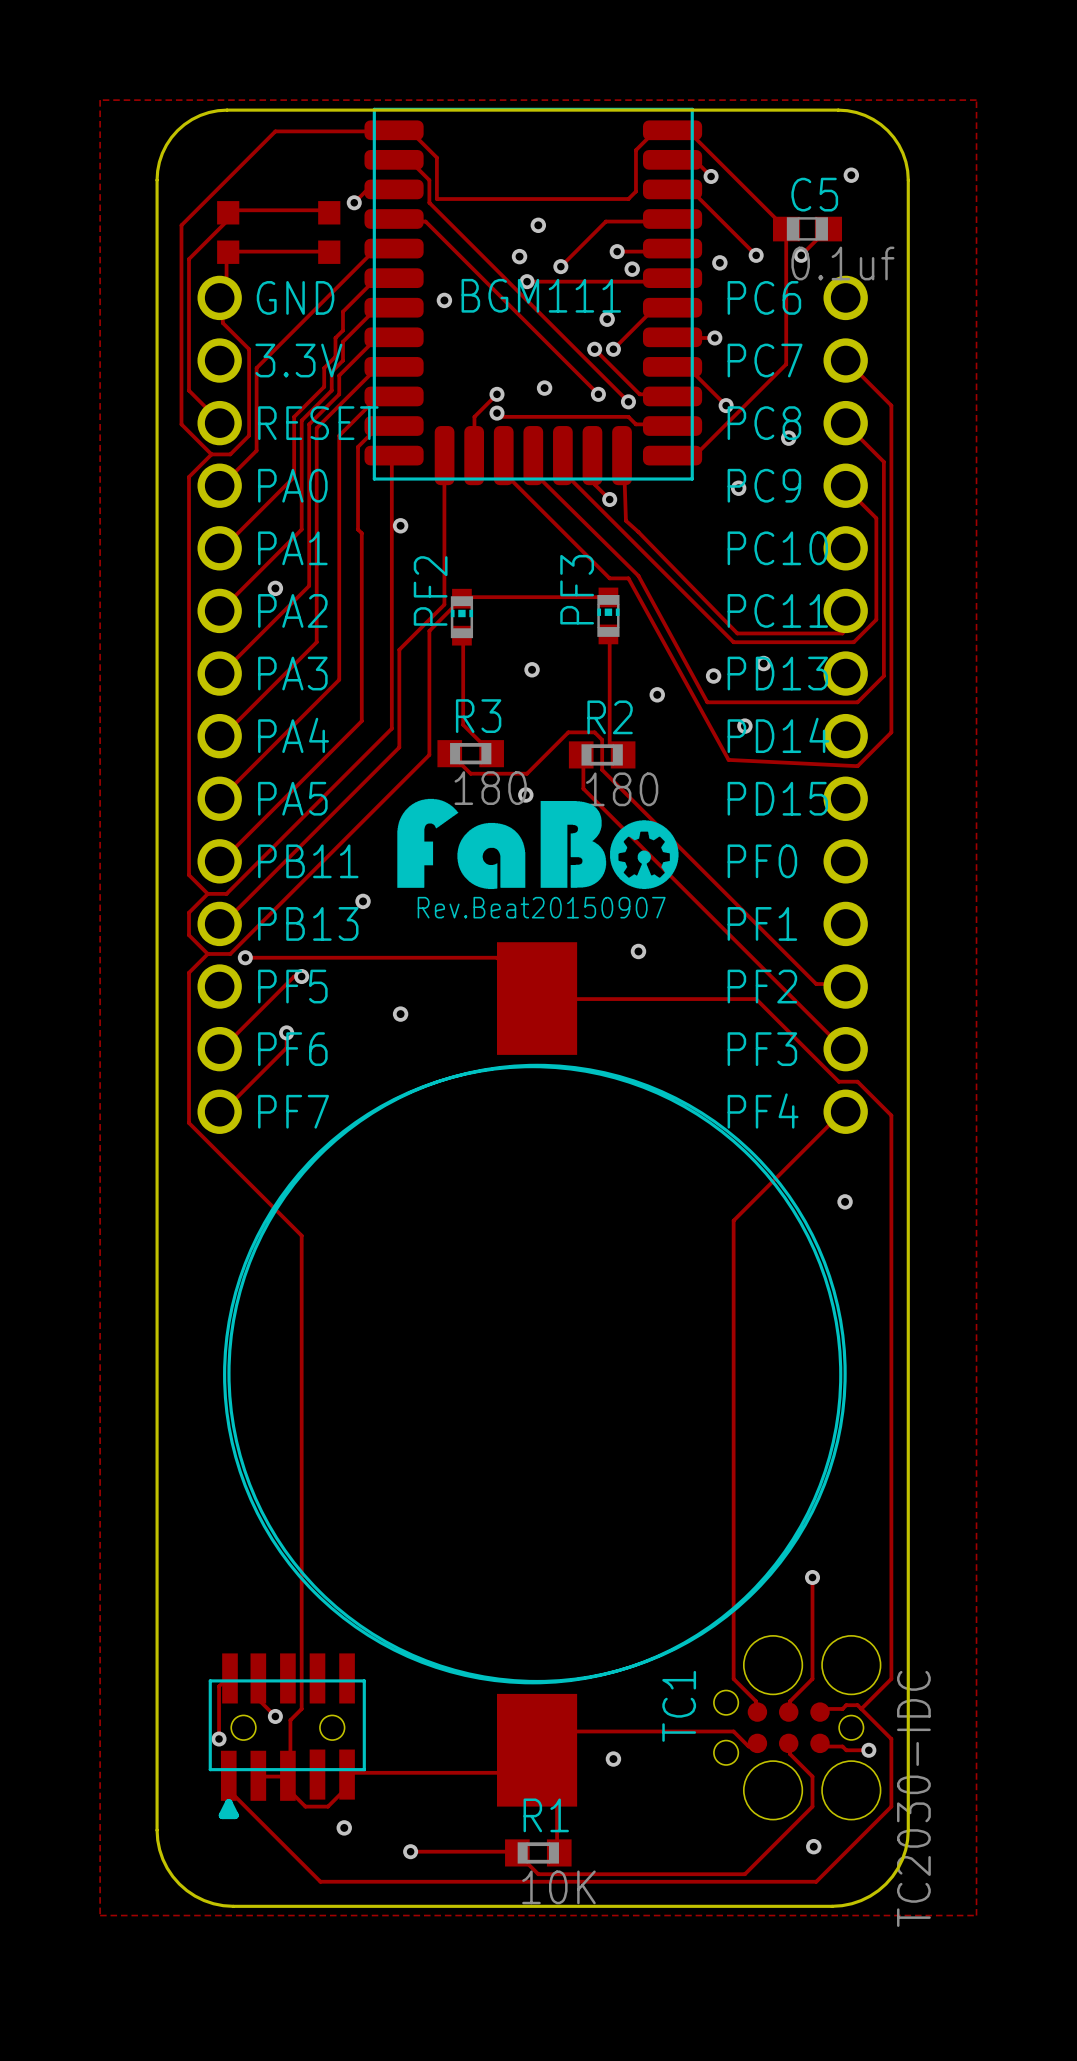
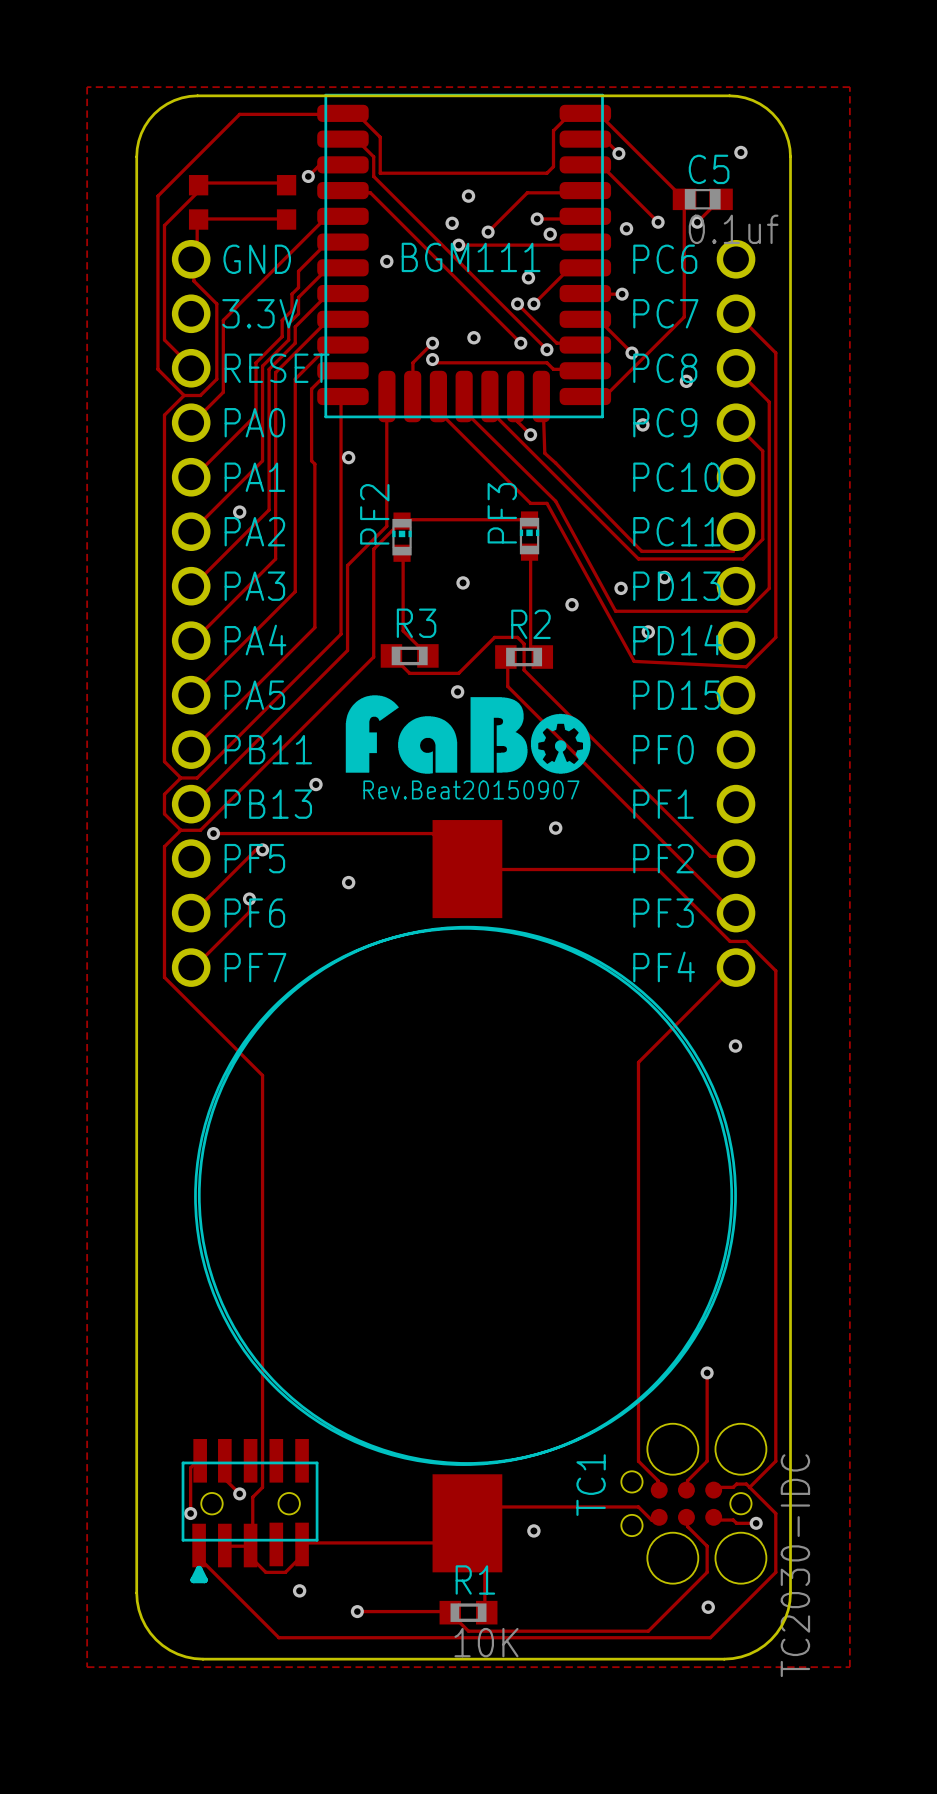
R3 value: 180 (490, 788) -> none
R2 value: 180 (622, 789) -> none

